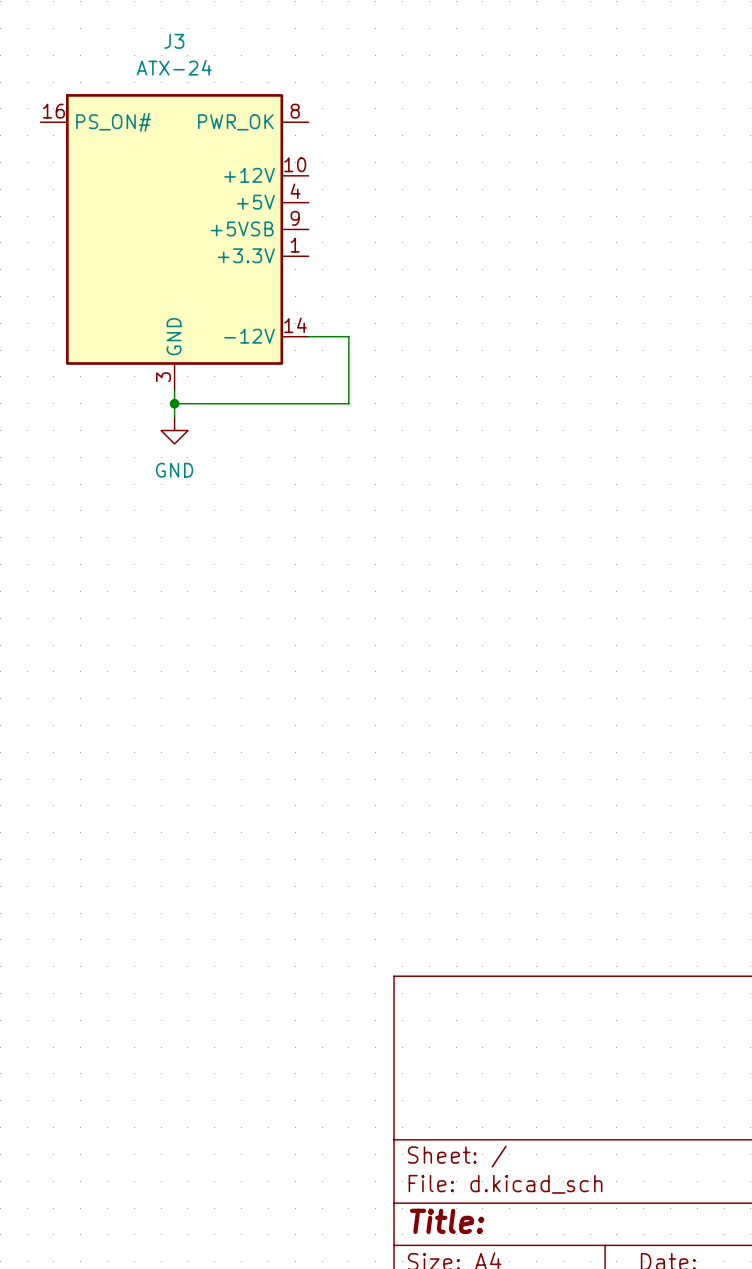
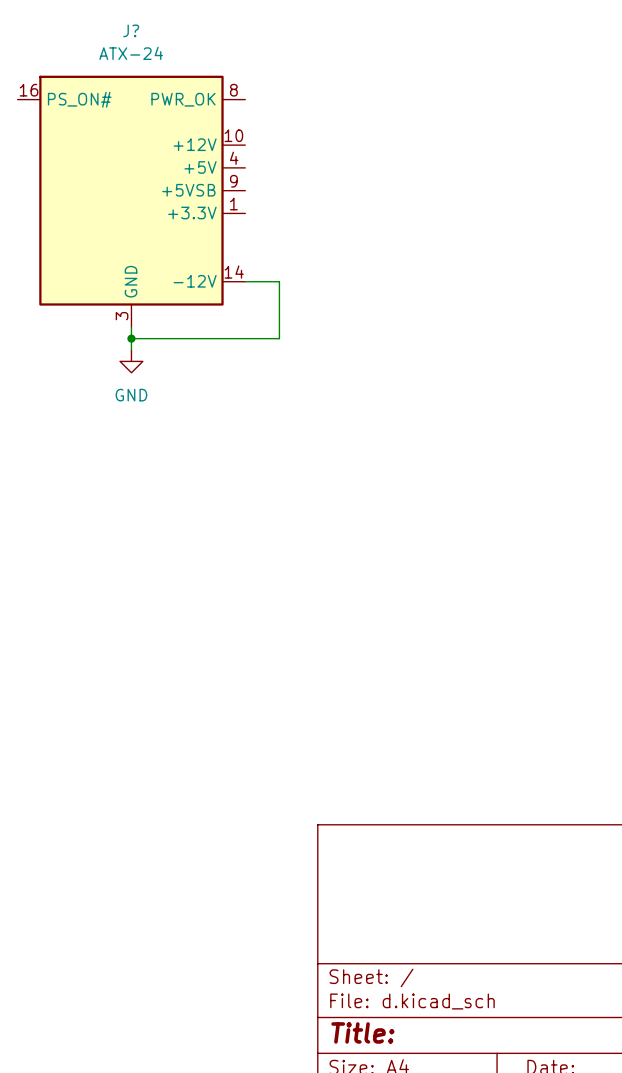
J3 name: J3 (174, 41) -> J? (131, 30)

